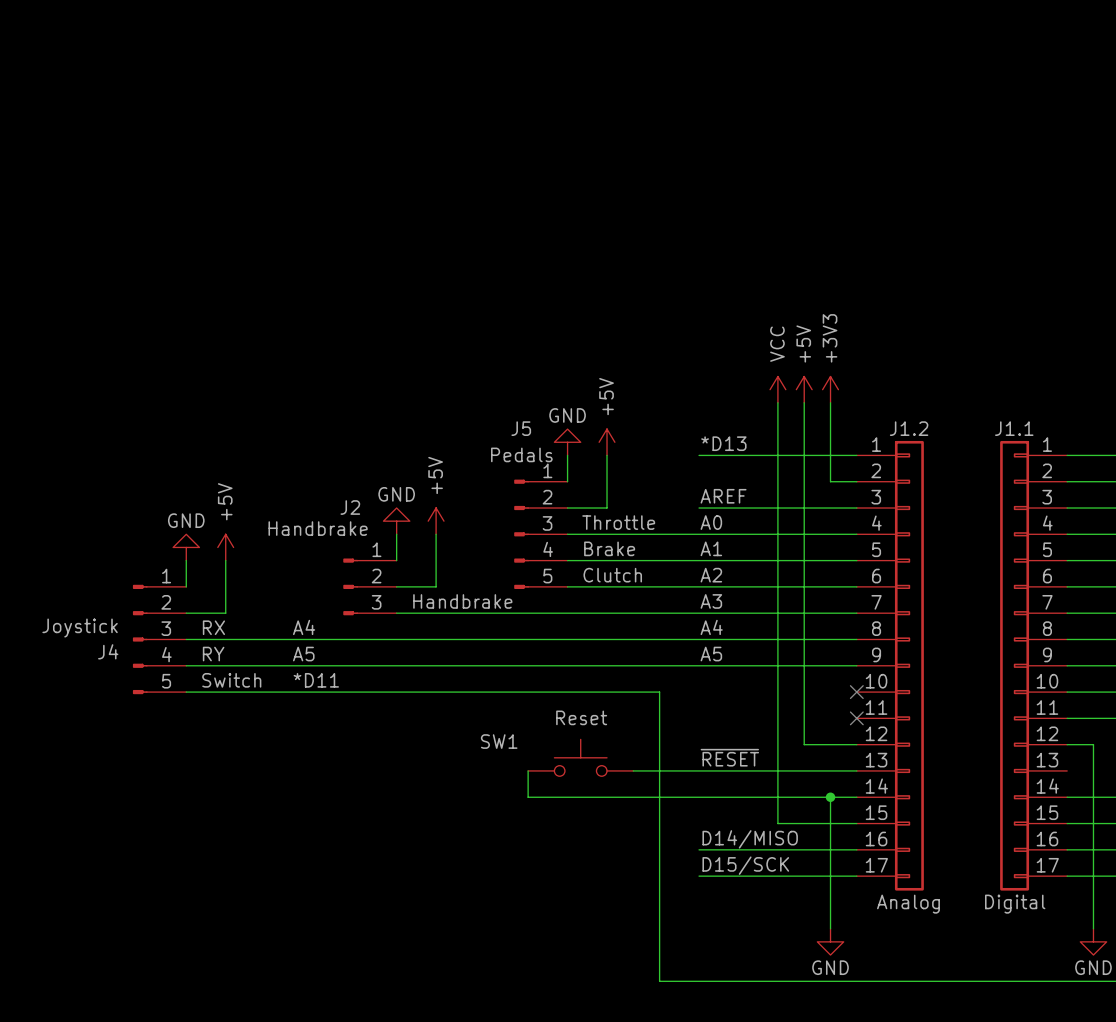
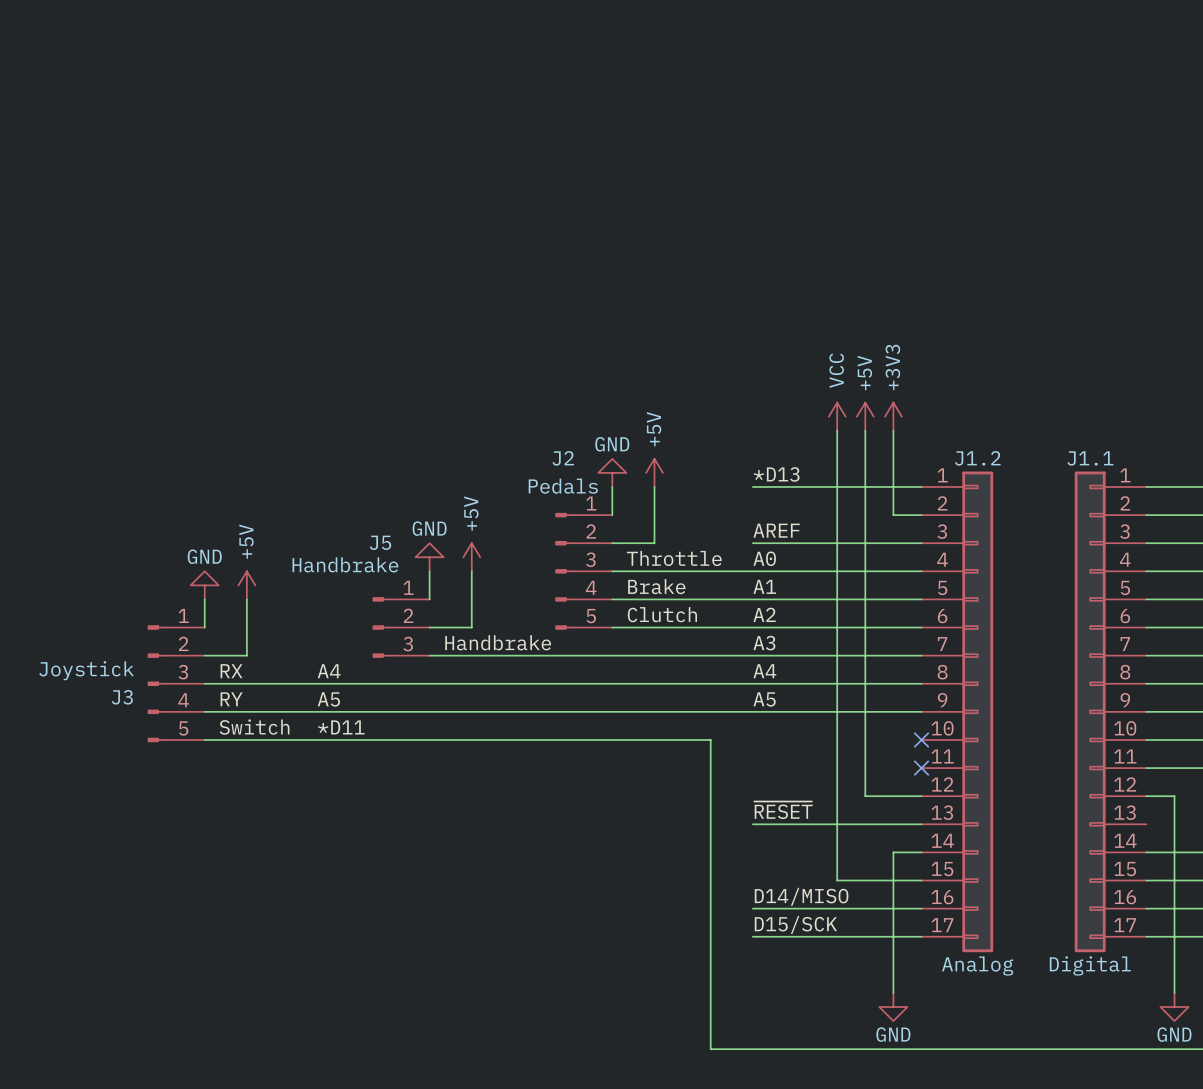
J5 name: J5 (521, 428) -> J2 (563, 458)
J2 name: J2 (350, 507) -> J5 (380, 542)
J4 name: J4 (108, 651) -> J3 (122, 697)
SW1: Reset (580, 757) -> none
wire: (528, 770) (528, 797) (830, 797) -> none
wire: (633, 770) (699, 770) -> none
junction: (830, 797) -> none

